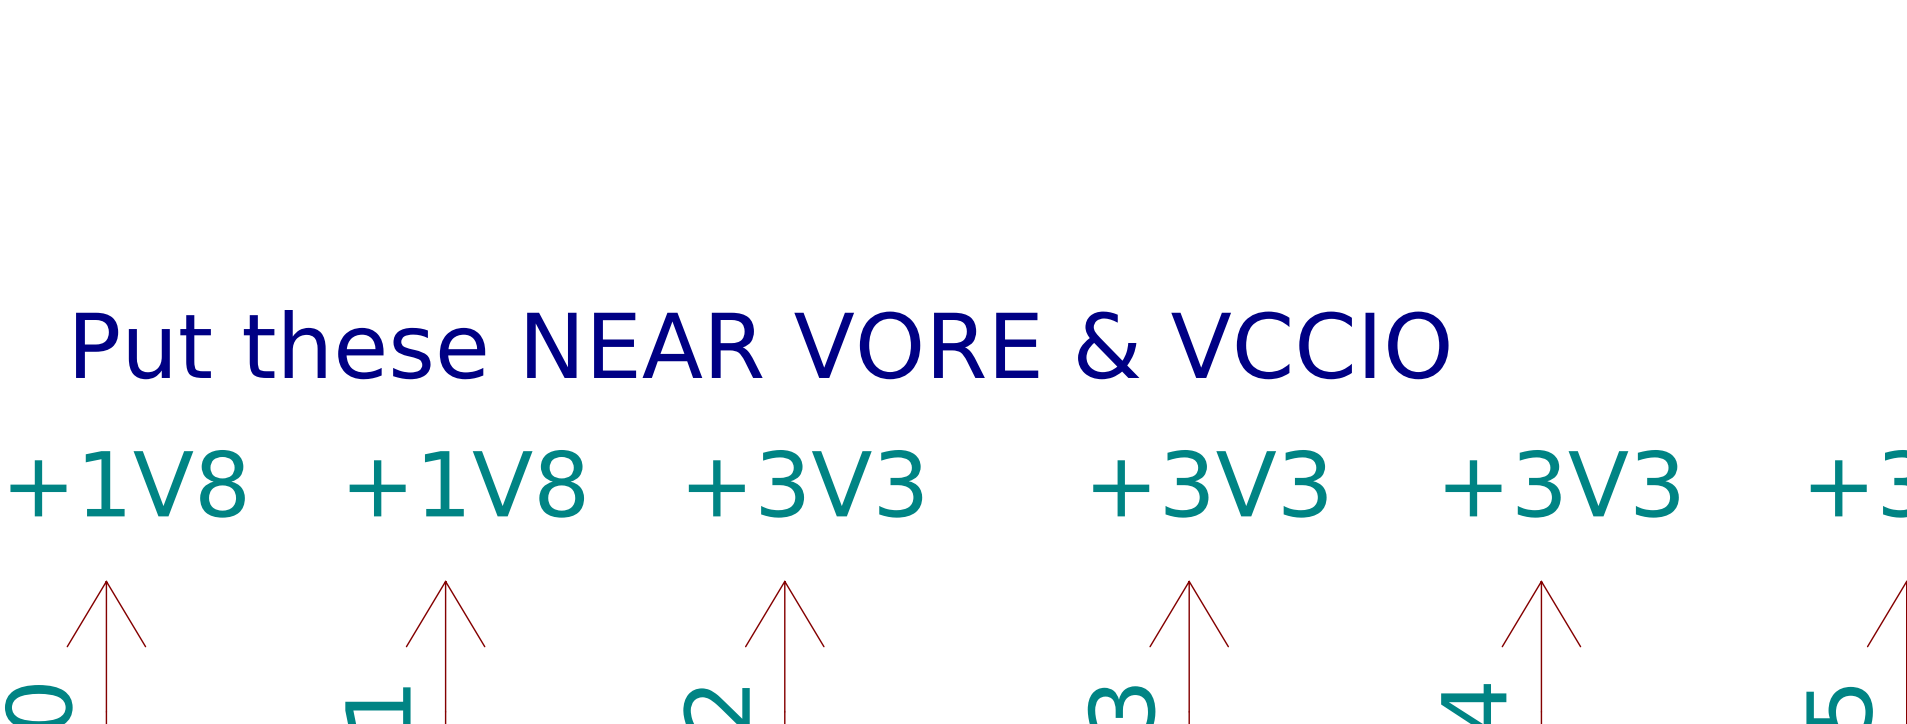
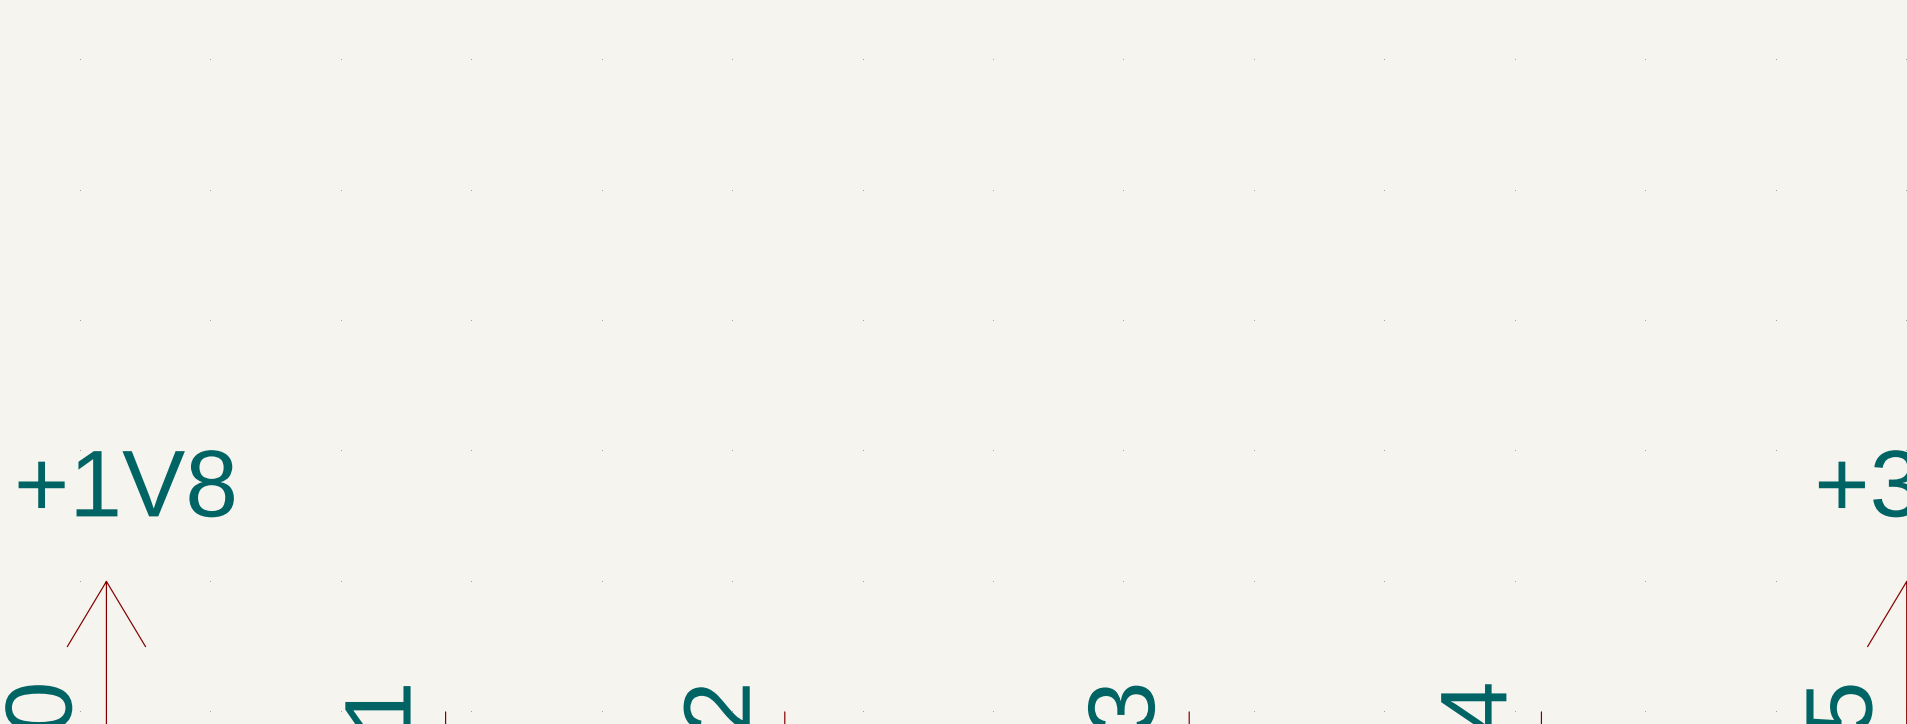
text: Put these NEAR VORE & VCCIO (762, 344) -> none
power symbol: +1V8 (445, 646) -> none
power symbol: +3V3 (784, 646) -> none
power symbol: +3V3 (1189, 646) -> none
power symbol: +3V3 (1541, 646) -> none

